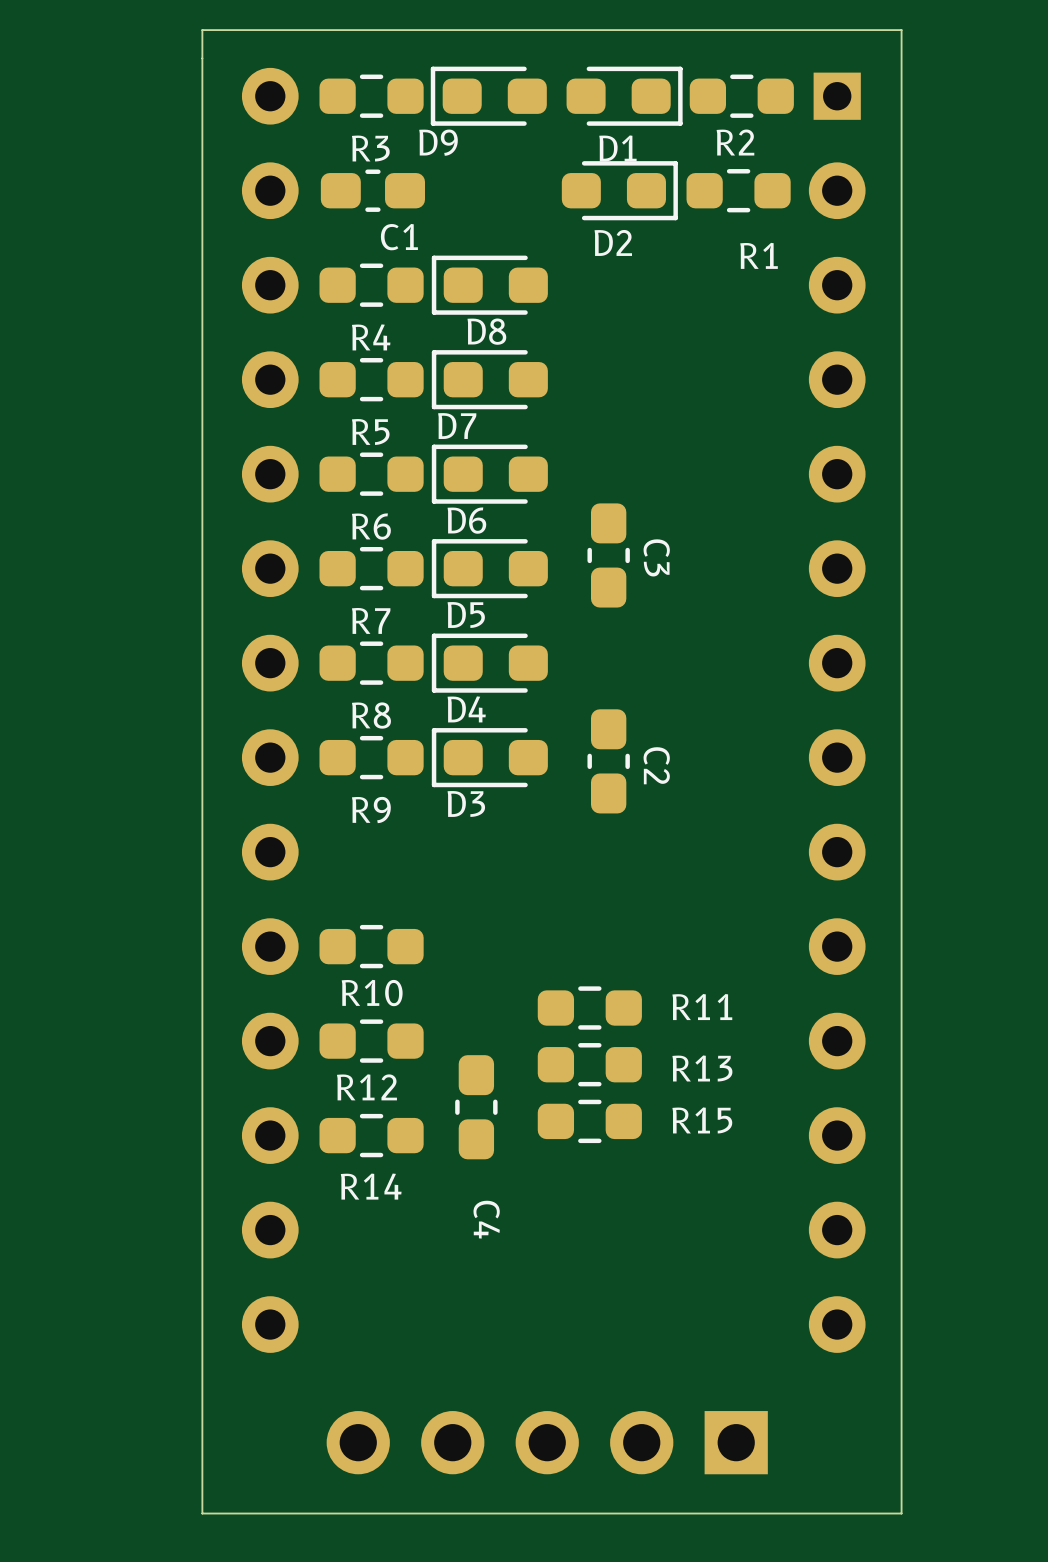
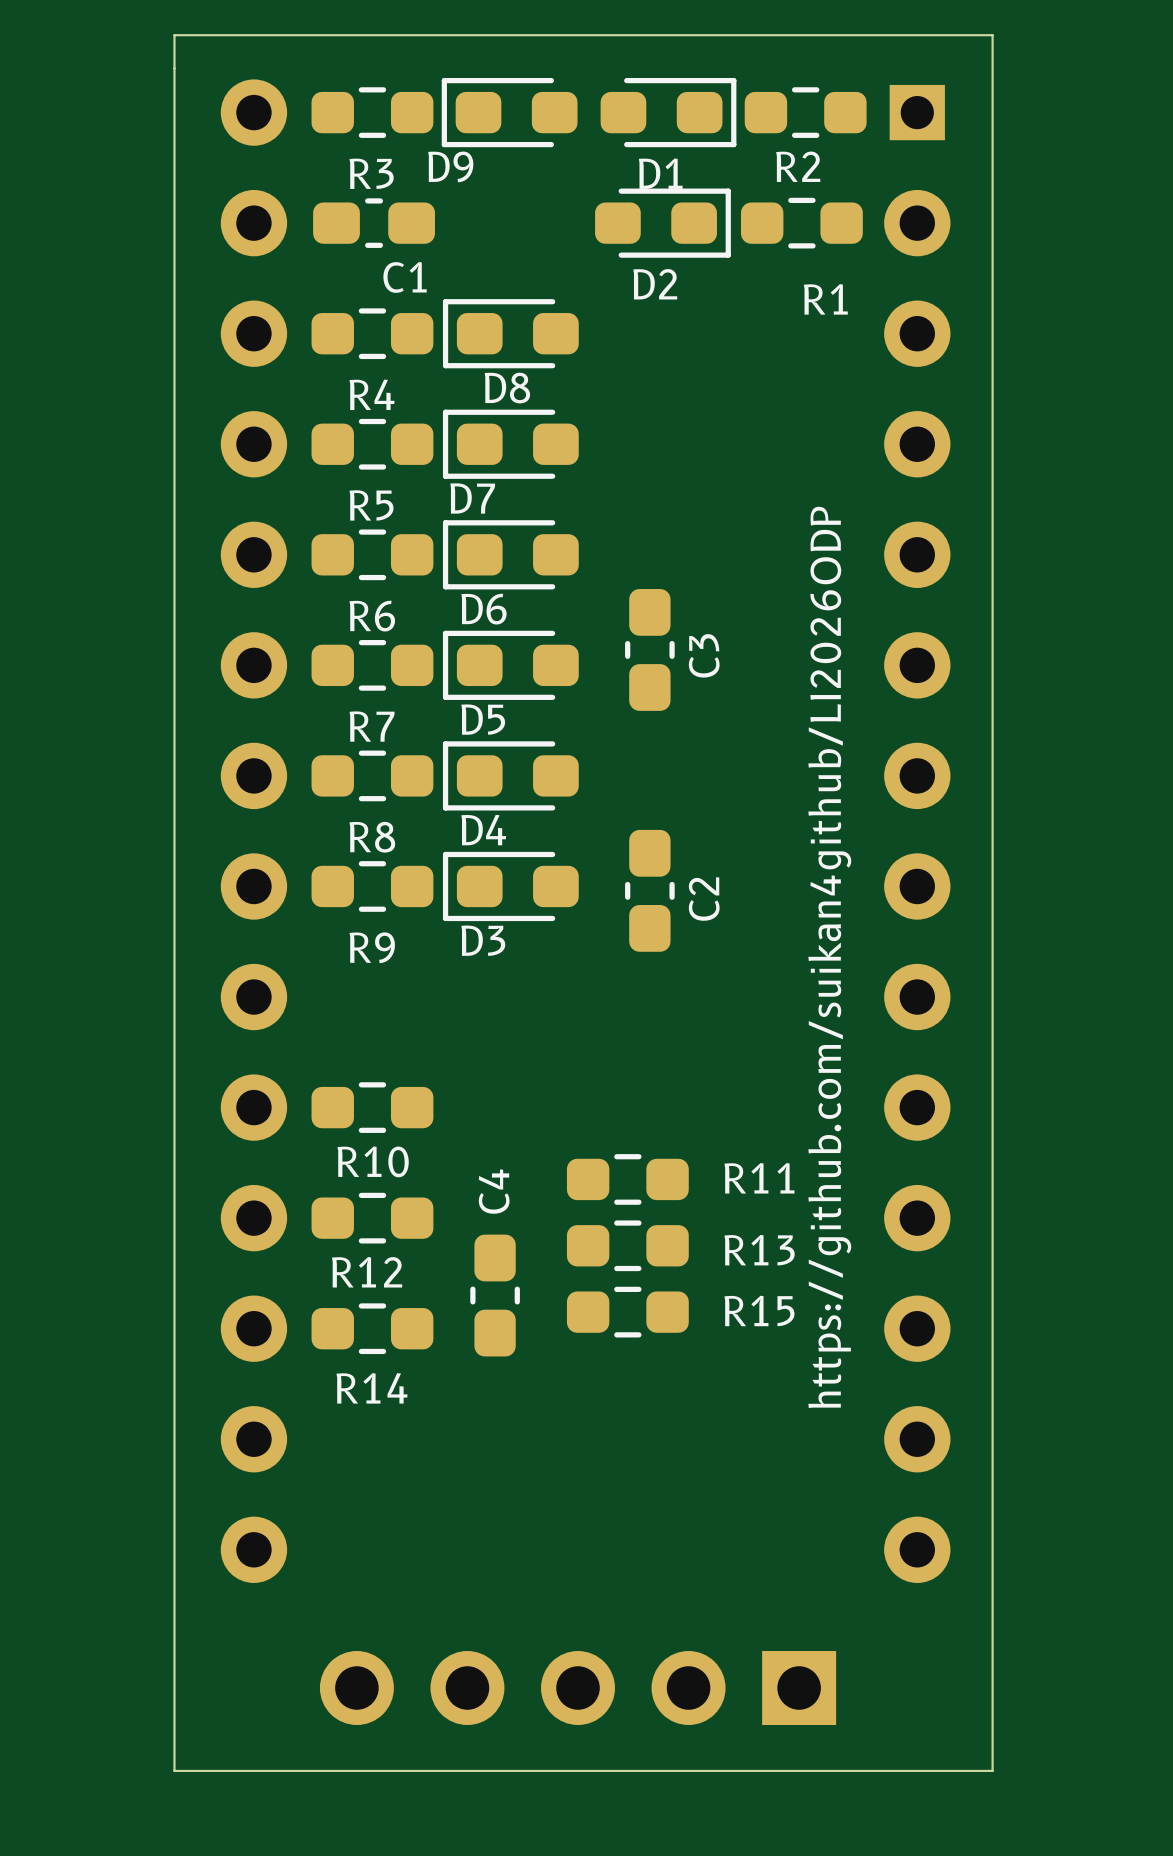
C3 name rotation: 0° (656, 557) -> 180° (704, 655)
C2 name rotation: 0° (656, 765) -> 180° (704, 899)
text: none -> https://github.com/suikan4github/LI2026ODP (829, 957)
C4 name rotation: 0° (486, 1219) -> 180° (494, 1191)
C4 name position: C4 (486, 1219) -> C4 (494, 1191)

